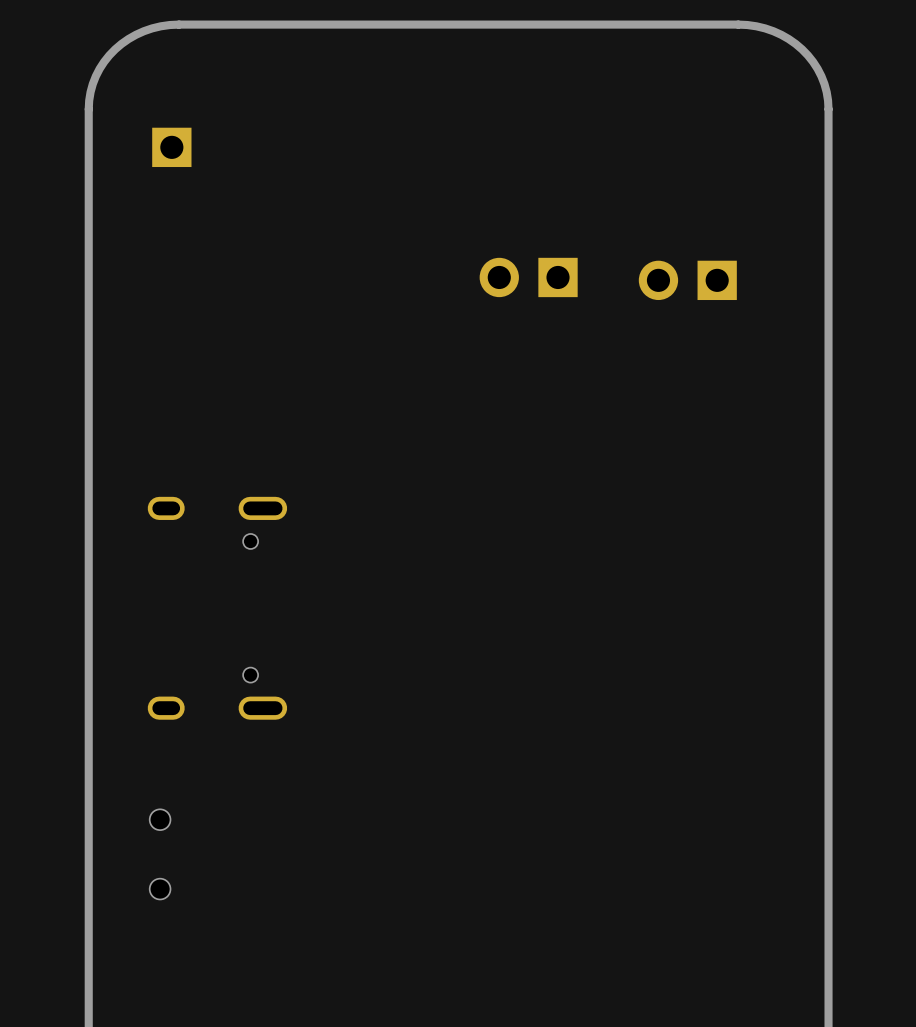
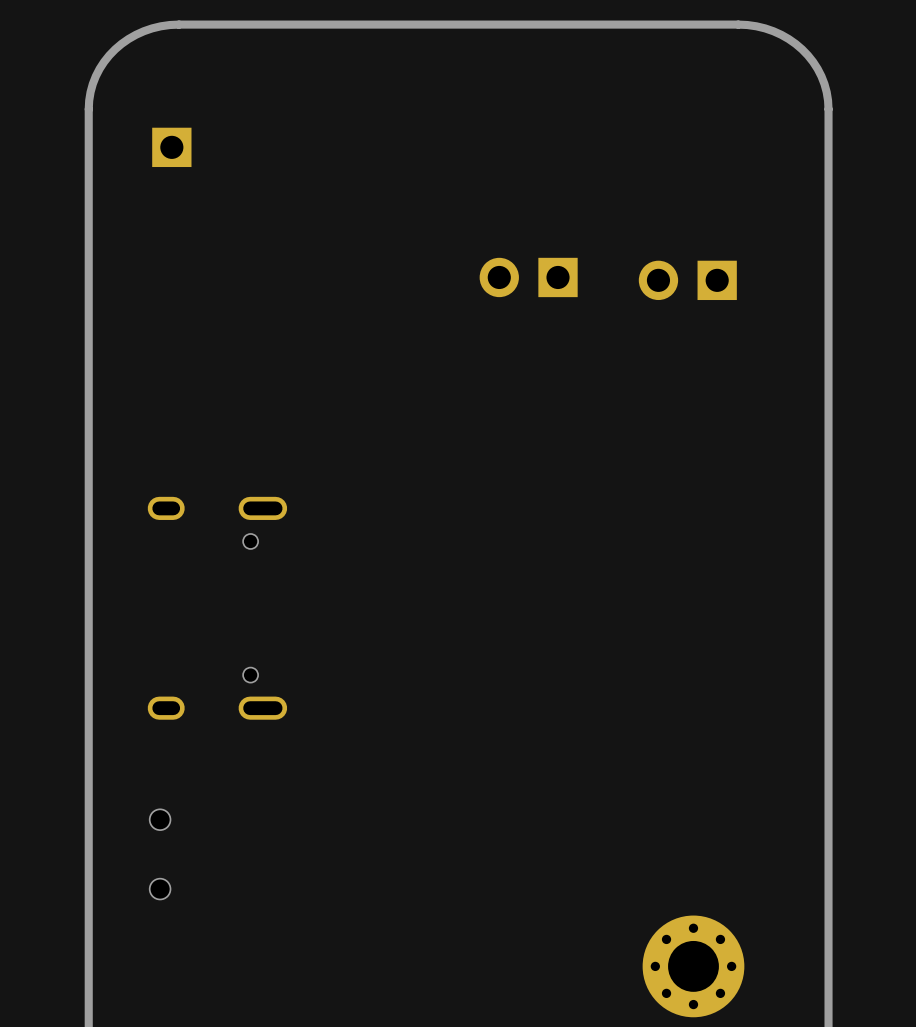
part: none -> (693, 966)

